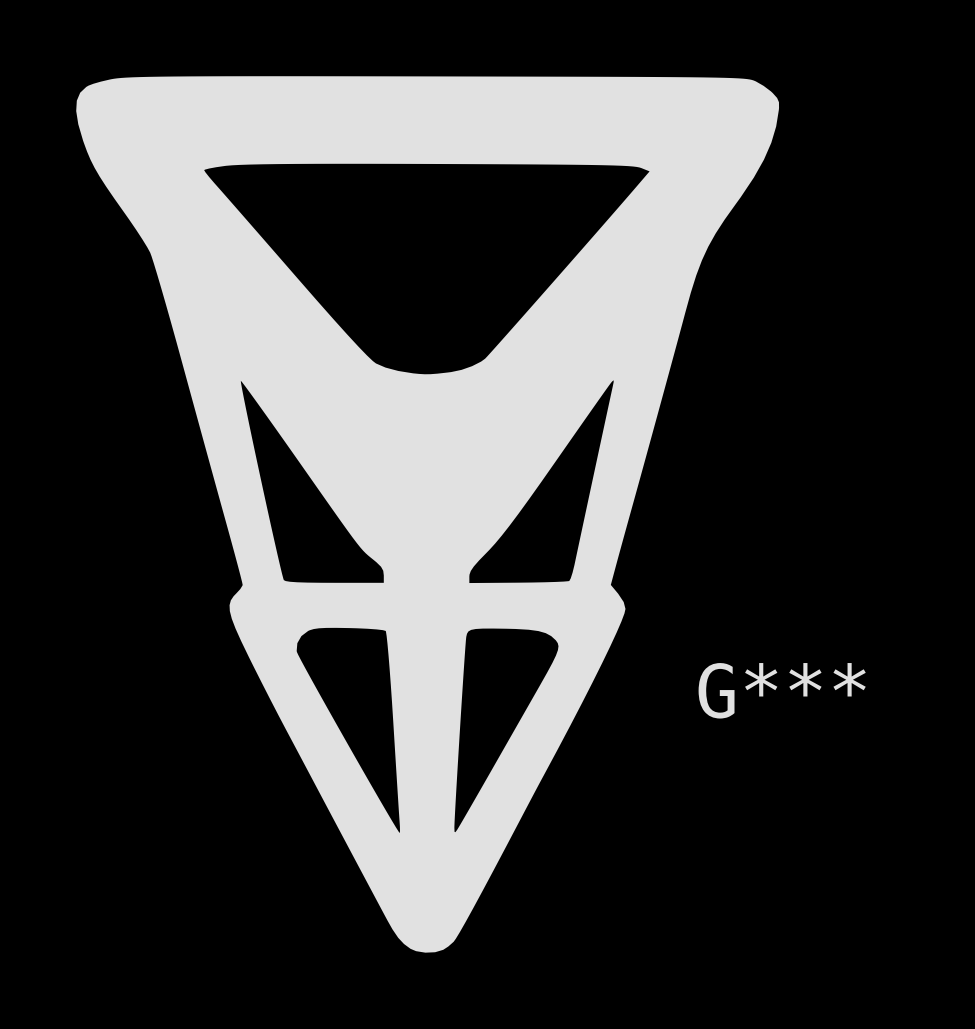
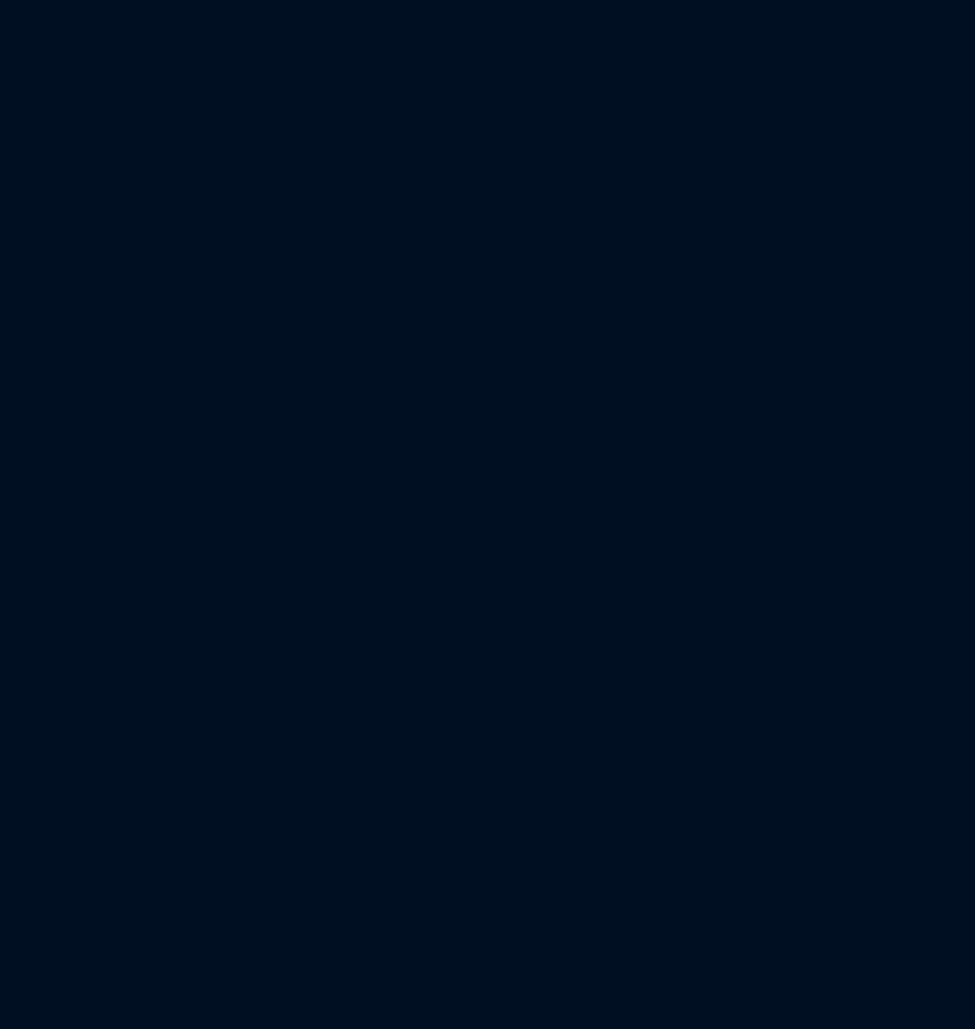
G***: (427, 514) -> none

